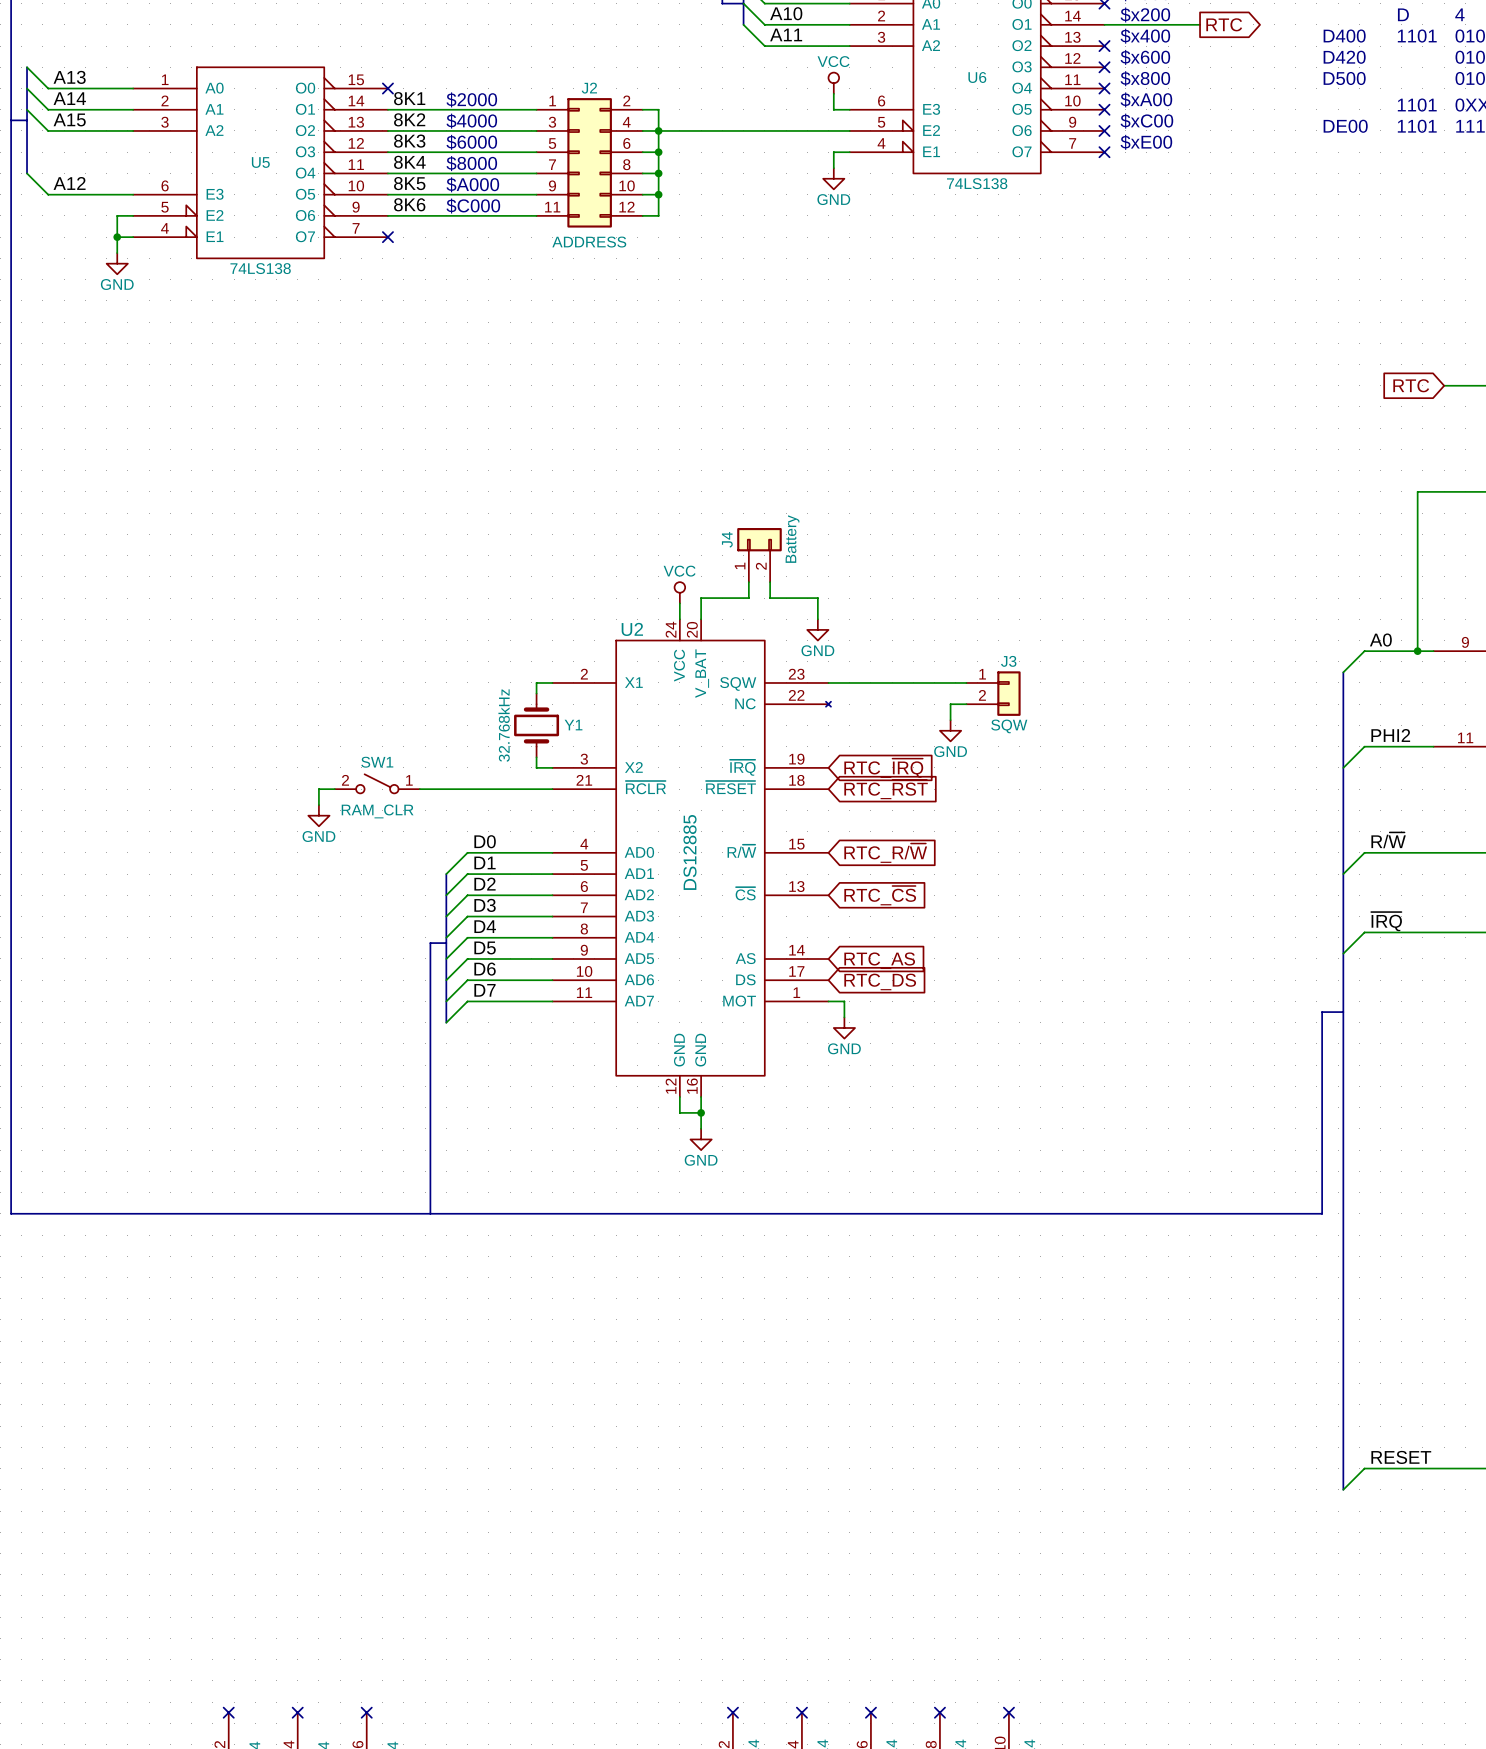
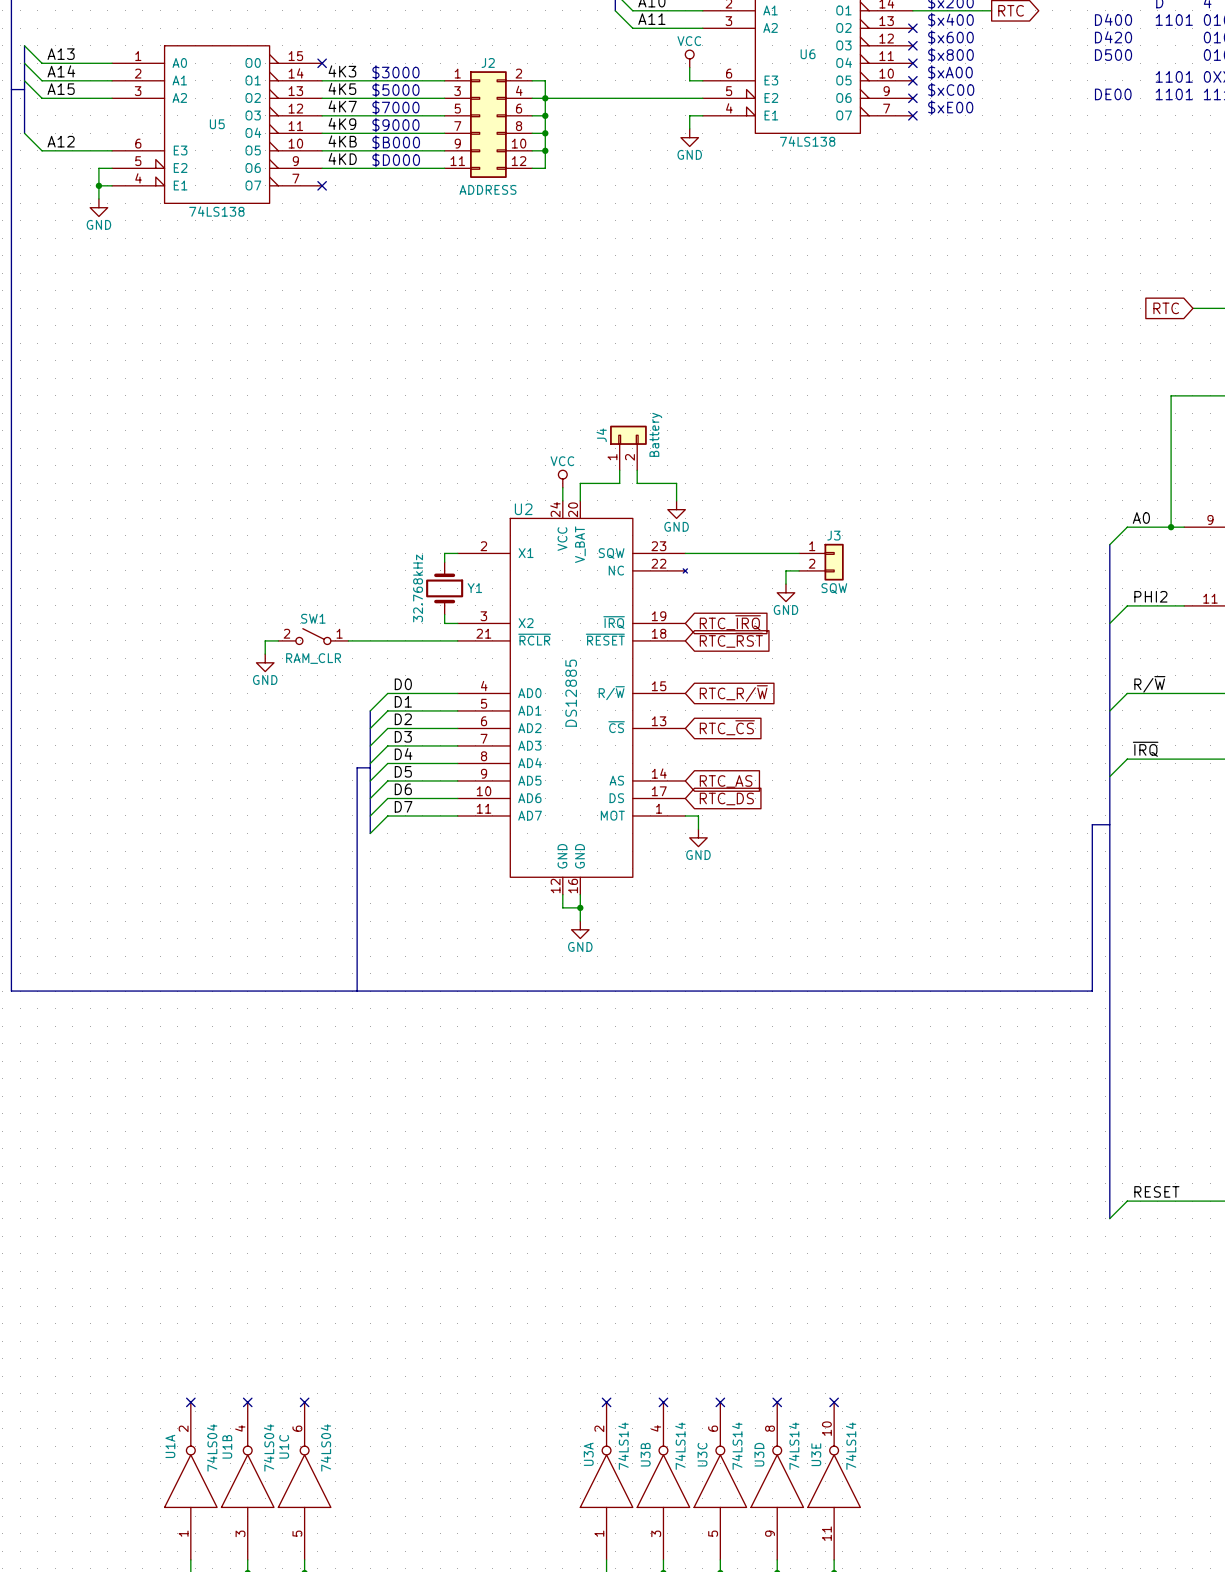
label: 8K1 (409, 98) -> 4K3 (342, 71)
text: $2000 (471, 99) -> $3000 (395, 72)
label: 8K2 (409, 119) -> 4K5 (342, 88)
text: $4000 (471, 121) -> $5000 (395, 90)
label: 8K3 (409, 141) -> 4K7 (342, 106)
text: $6000 (471, 142) -> $7000 (395, 107)
label: 8K4 (409, 162) -> 4K9 (342, 123)
text: $8000 (471, 163) -> $9000 (395, 125)
label: 8K5 (409, 183) -> 4KB (342, 141)
text: $A000 (472, 184) -> $B000 (396, 142)
label: 8K6 (409, 204) -> 4KD (342, 158)
text: $C000 (473, 206) -> $D000 (396, 160)

